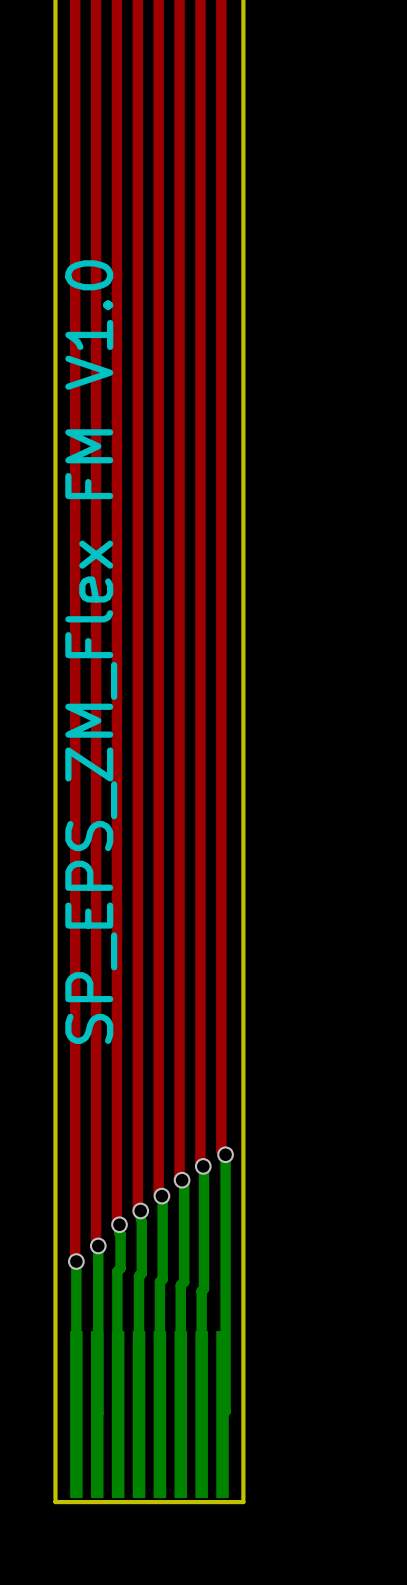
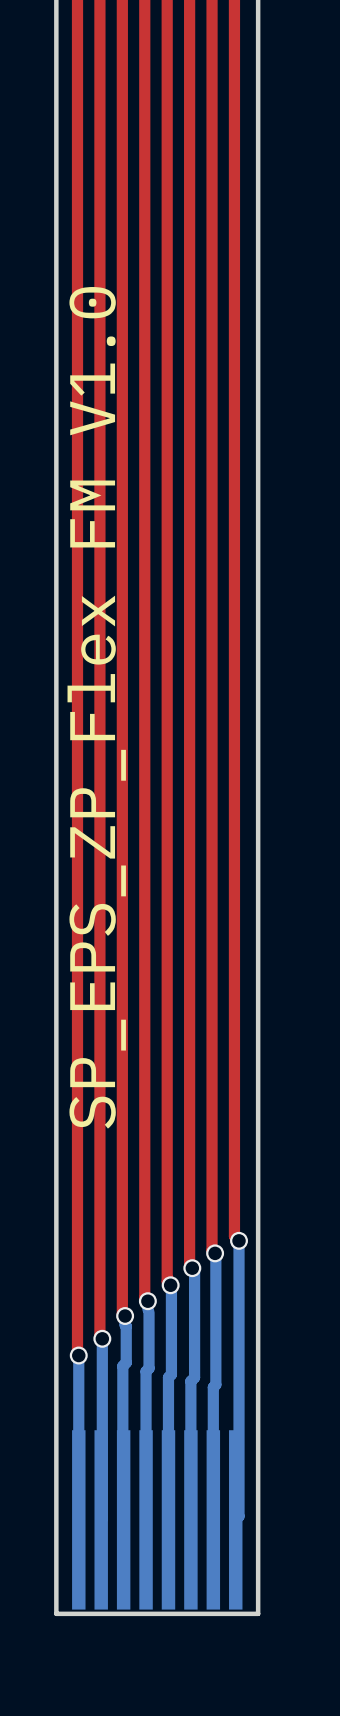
text: SP_EPS_ZM_Flex FM V1.0 (91, 652) -> SP_EPS_ZP_Flex FM V1.0 (96, 707)

